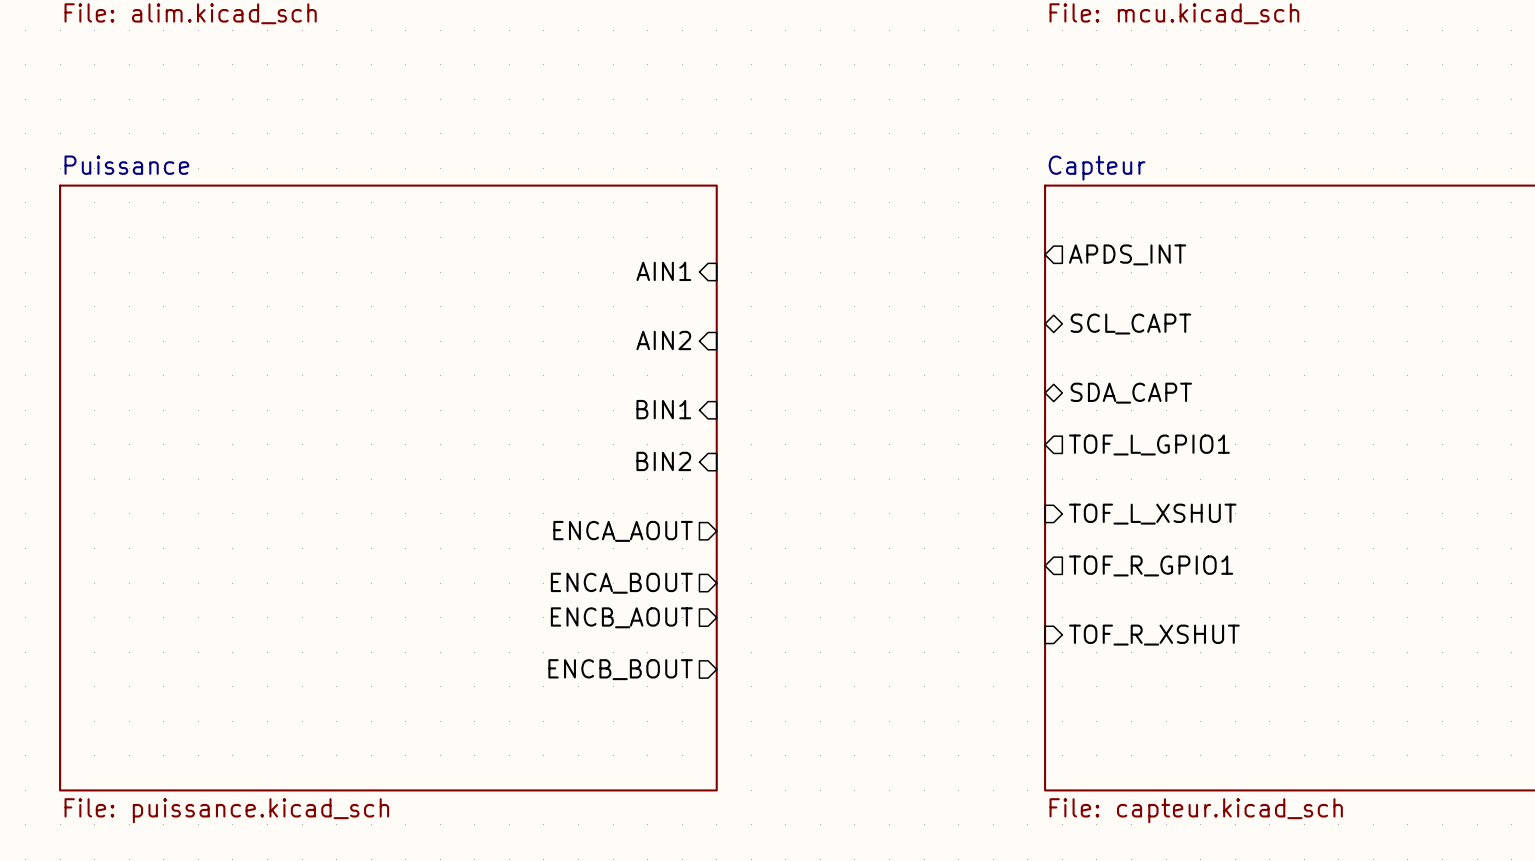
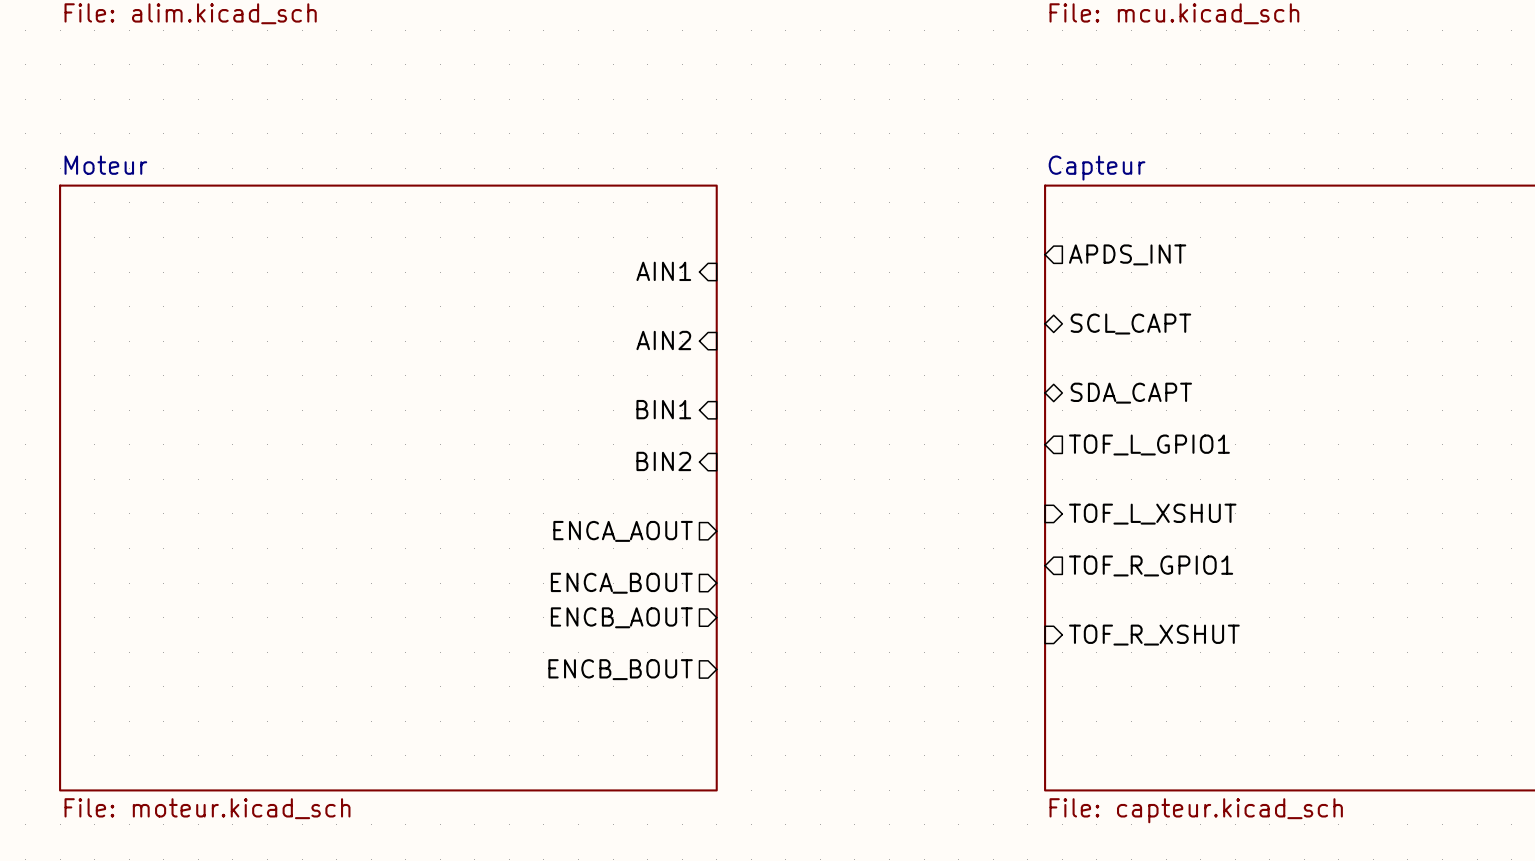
sheet Puissance name: Puissance (126, 165) -> Moteur (105, 165)
sheet Puissance value: File: puissance.kicad_sch (226, 810) -> File: moteur.kicad_sch (207, 808)

